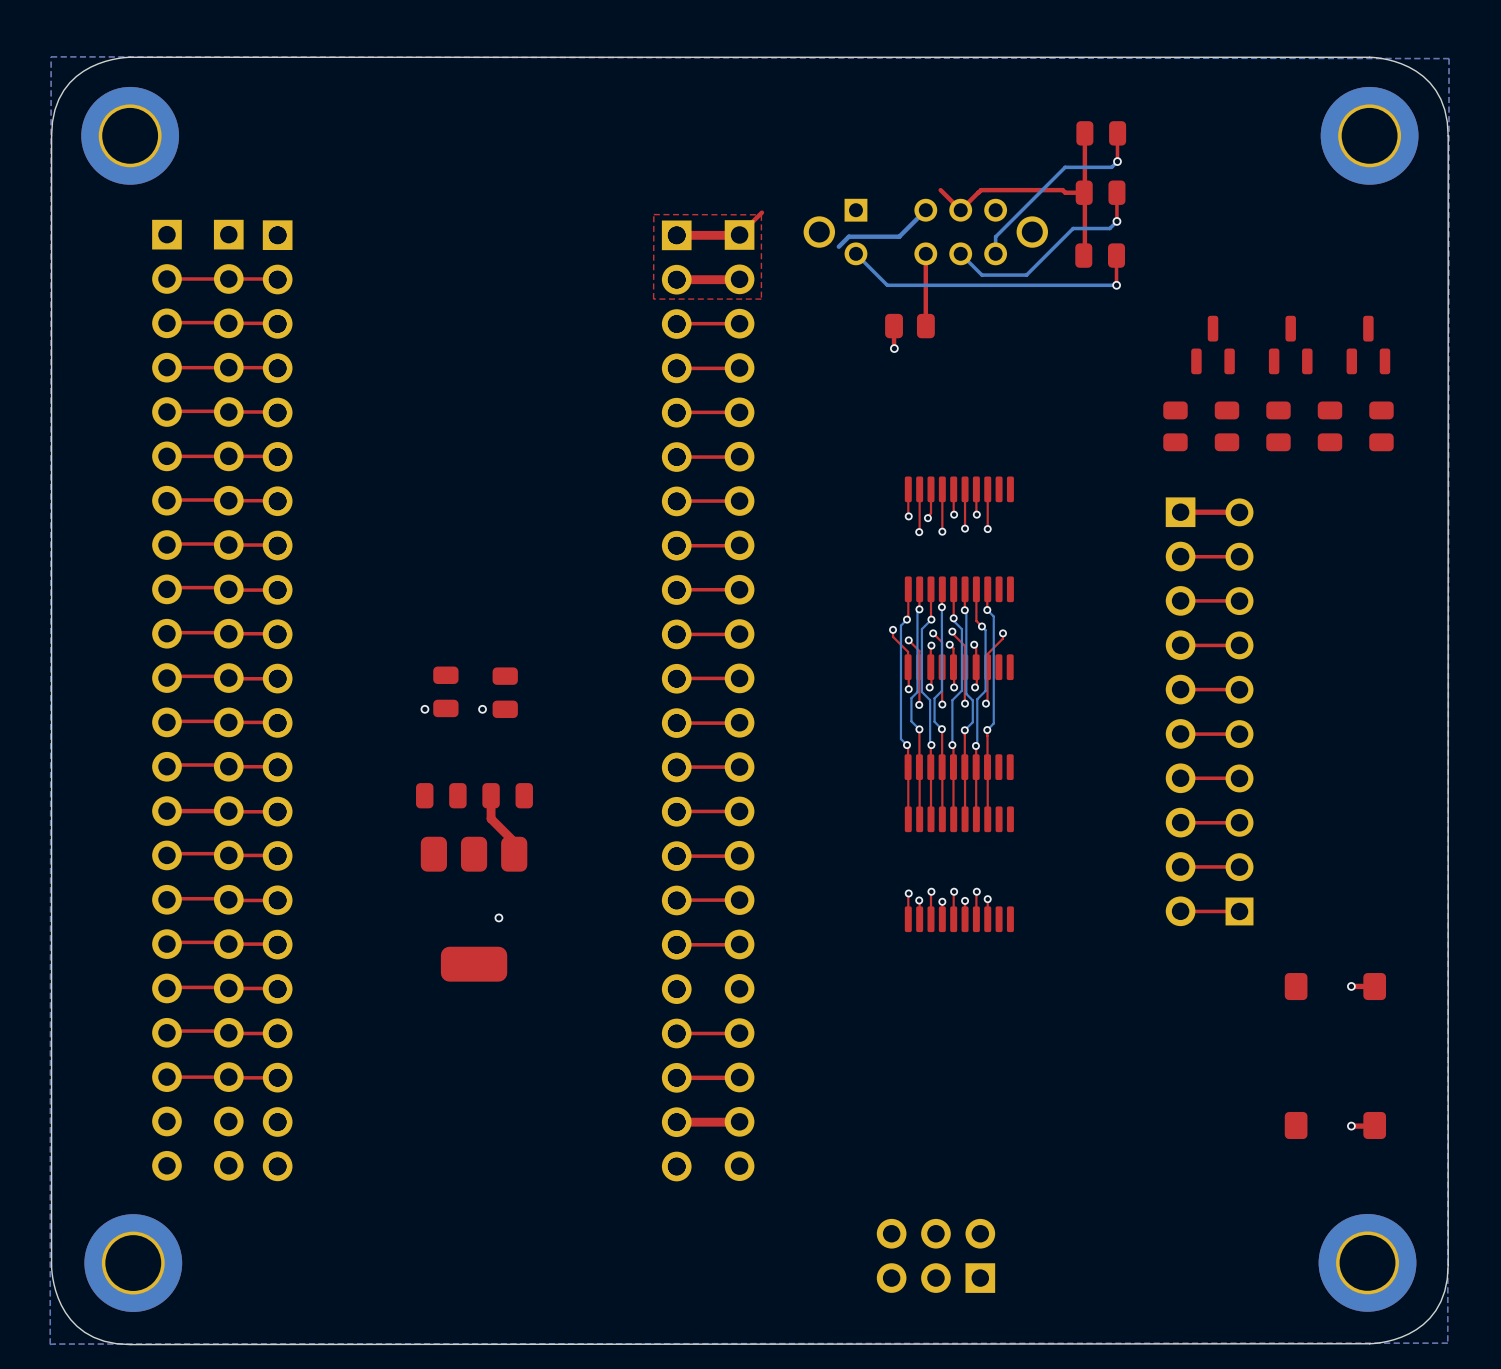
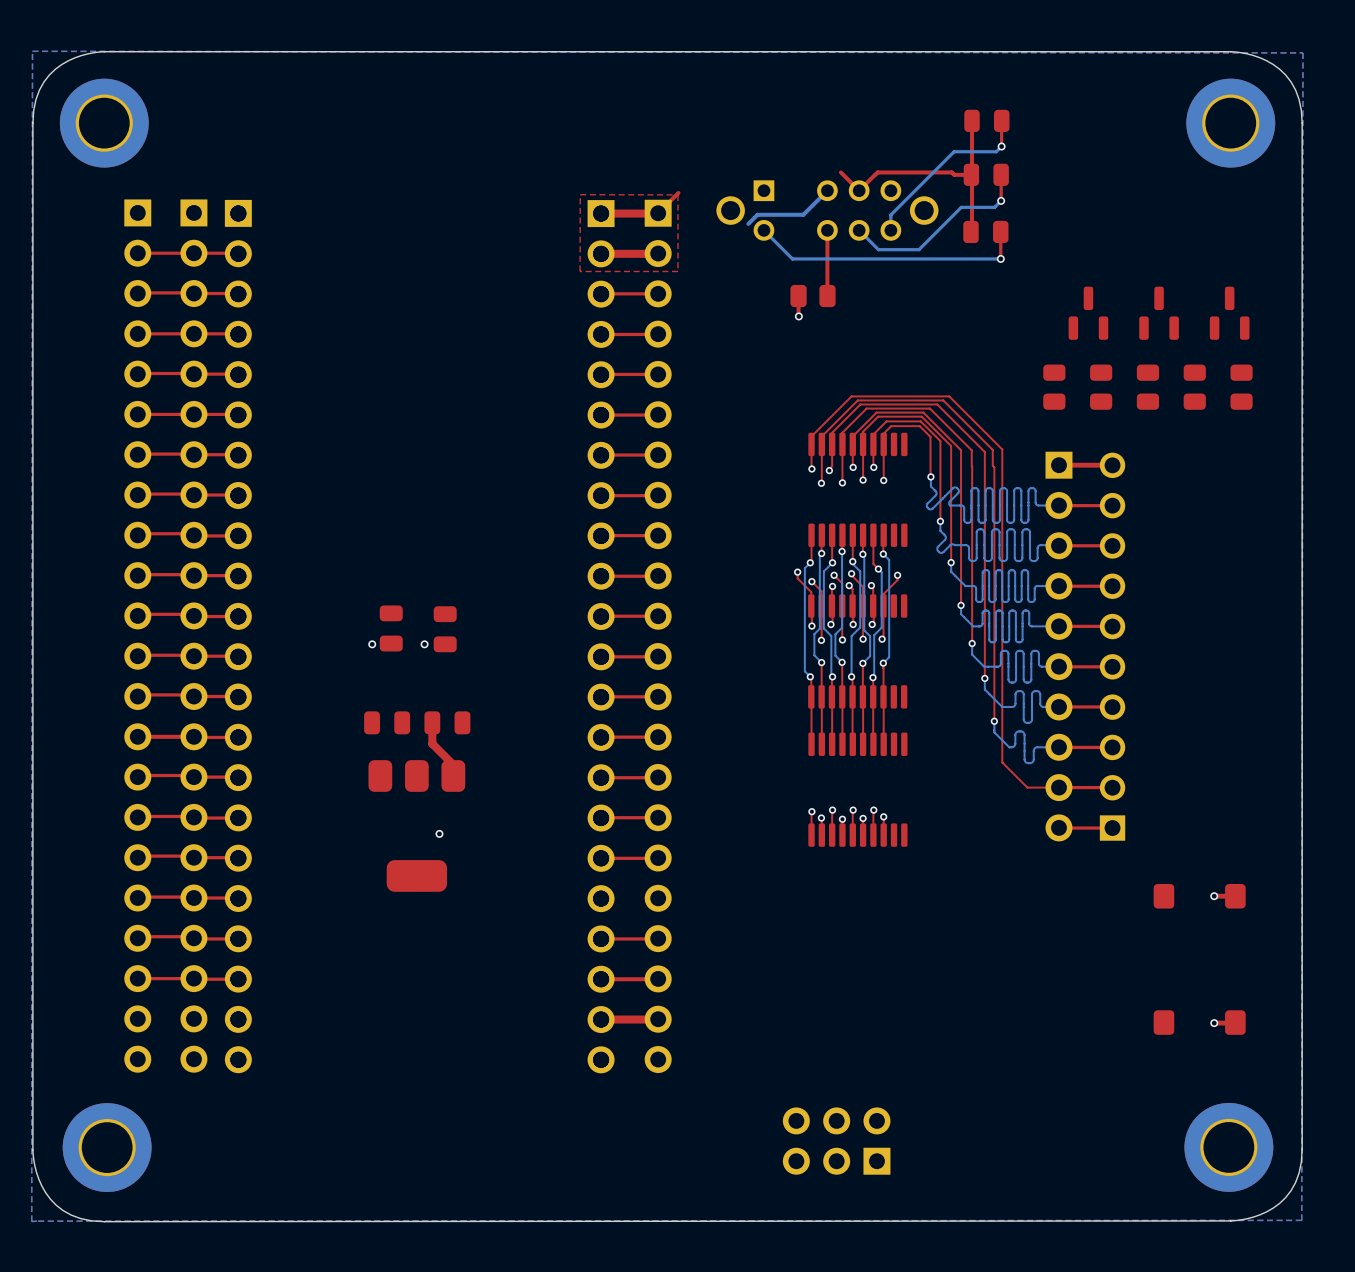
top track: none -> (811, 444) (811, 436) (851, 396) (949, 396) (1002, 449) (1002, 762) (1027, 787) (1058, 787)
top track: none -> (821, 444) (821, 436) (857, 400) (943, 400) (992, 449) (994, 721)
top track: none -> (832, 444) (832, 432) (860, 404) (937, 404) (984, 452) (984, 678)
top track: none -> (842, 444) (842, 432) (866, 408) (929, 408) (971, 450) (972, 643)
top track: none -> (852, 444) (852, 436) (876, 412) (923, 412) (961, 450) (961, 605)
top track: none -> (863, 444) (863, 431) (878, 416) (921, 416) (951, 446) (951, 562)
top track: none -> (873, 444) (873, 434) (886, 421) (920, 421) (940, 441) (940, 521)
top track: none -> (883, 444) (883, 433) (891, 426) (919, 426) (930, 436) (930, 476)
bottom track: none -> (930, 476) (930, 486) (936, 493) (927, 504) (927, 507) (932, 509) (956, 487) (958, 492) (949, 504) (963, 506) (964, 520) (966, 522) (971, 520) (971, 490) (973, 488) (978, 490) (978, 520) (980, 522) (985, 520) (985, 490) (987, 488) (992, 490) (992, 520) (994, 522) (999, 520) (999, 490) (1002, 488) (1006, 490) (1007, 520) (1009, 522) (1014, 520) (1014, 491) (1015, 488) (1021, 490) (1021, 519) (1023, 522) (1028, 520) (1028, 491) (1030, 488) (1035, 489) (1037, 505) (1058, 505)
via: none -> (930, 476)
bottom track: none -> (940, 521) (940, 530) (945, 537) (937, 547) (937, 550) (942, 552) (952, 544) (967, 545) (969, 547) (969, 558) (971, 560) (976, 558) (976, 531) (979, 529) (984, 531) (984, 558) (986, 560) (991, 558) (991, 531) (994, 529) (999, 531) (999, 558) (1001, 560) (1007, 558) (1007, 531) (1009, 529) (1014, 531) (1014, 558) (1016, 560) (1022, 558) (1022, 531) (1024, 529) (1029, 531) (1030, 558) (1031, 560) (1037, 559) (1039, 545) (1058, 545)
via: none -> (940, 521)
bottom track: none -> (951, 562) (951, 571) (965, 586) (975, 587) (976, 599) (978, 601) (982, 599) (982, 572) (984, 570) (989, 572) (989, 599) (991, 601) (995, 599) (995, 572) (997, 570) (1002, 572) (1002, 599) (1004, 601) (1008, 599) (1008, 572) (1010, 570) (1015, 572) (1015, 599) (1016, 601) (1021, 599) (1021, 572) (1023, 570) (1028, 572) (1029, 601) (1034, 600) (1036, 586) (1058, 586)
via: none -> (951, 562)
bottom track: none -> (961, 605) (961, 614) (973, 626) (981, 625) (982, 612) (988, 611) (989, 639) (991, 642) (995, 640) (995, 612) (997, 610) (1002, 612) (1002, 639) (1004, 642) (1009, 640) (1009, 612) (1011, 610) (1015, 612) (1015, 639) (1017, 642) (1022, 640) (1022, 612) (1024, 610) (1029, 612) (1030, 626) (1058, 626)
via: none -> (961, 605)
bottom track: none -> (972, 643) (972, 654) (984, 666) (999, 666) (1001, 652) (1007, 651) (1008, 679) (1010, 682) (1016, 680) (1016, 653) (1018, 650) (1023, 653) (1023, 679) (1025, 682) (1031, 680) (1031, 653) (1033, 651) (1038, 652) (1040, 666) (1058, 666)
via: none -> (972, 643)
bottom track: none -> (984, 678) (984, 689) (1002, 706) (1014, 706) (1015, 692) (1022, 692) (1023, 719) (1025, 722) (1031, 720) (1032, 693) (1034, 691) (1039, 692) (1041, 706) (1058, 706)
via: none -> (984, 678)
bottom track: none -> (994, 721) (994, 732) (1009, 747) (1014, 745) (1016, 732) (1023, 732) (1024, 759) (1027, 762) (1033, 761) (1035, 747) (1058, 747)
via: none -> (994, 721)

